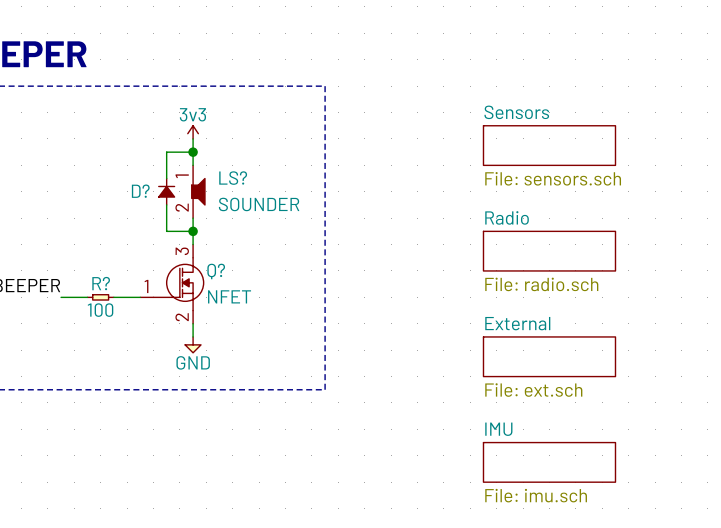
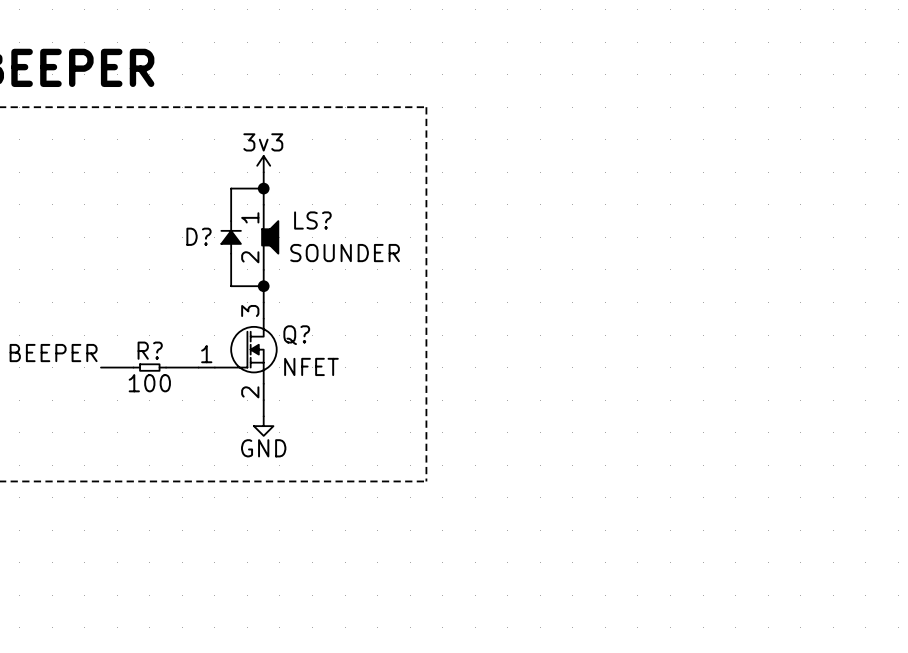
sheet Sensors: File: sensors.sch (549, 145) -> none
sheet Radio: File: radio.sch (549, 251) -> none
sheet External: File: ext.sch (549, 356) -> none
sheet IMU: File: imu.sch (549, 462) -> none

